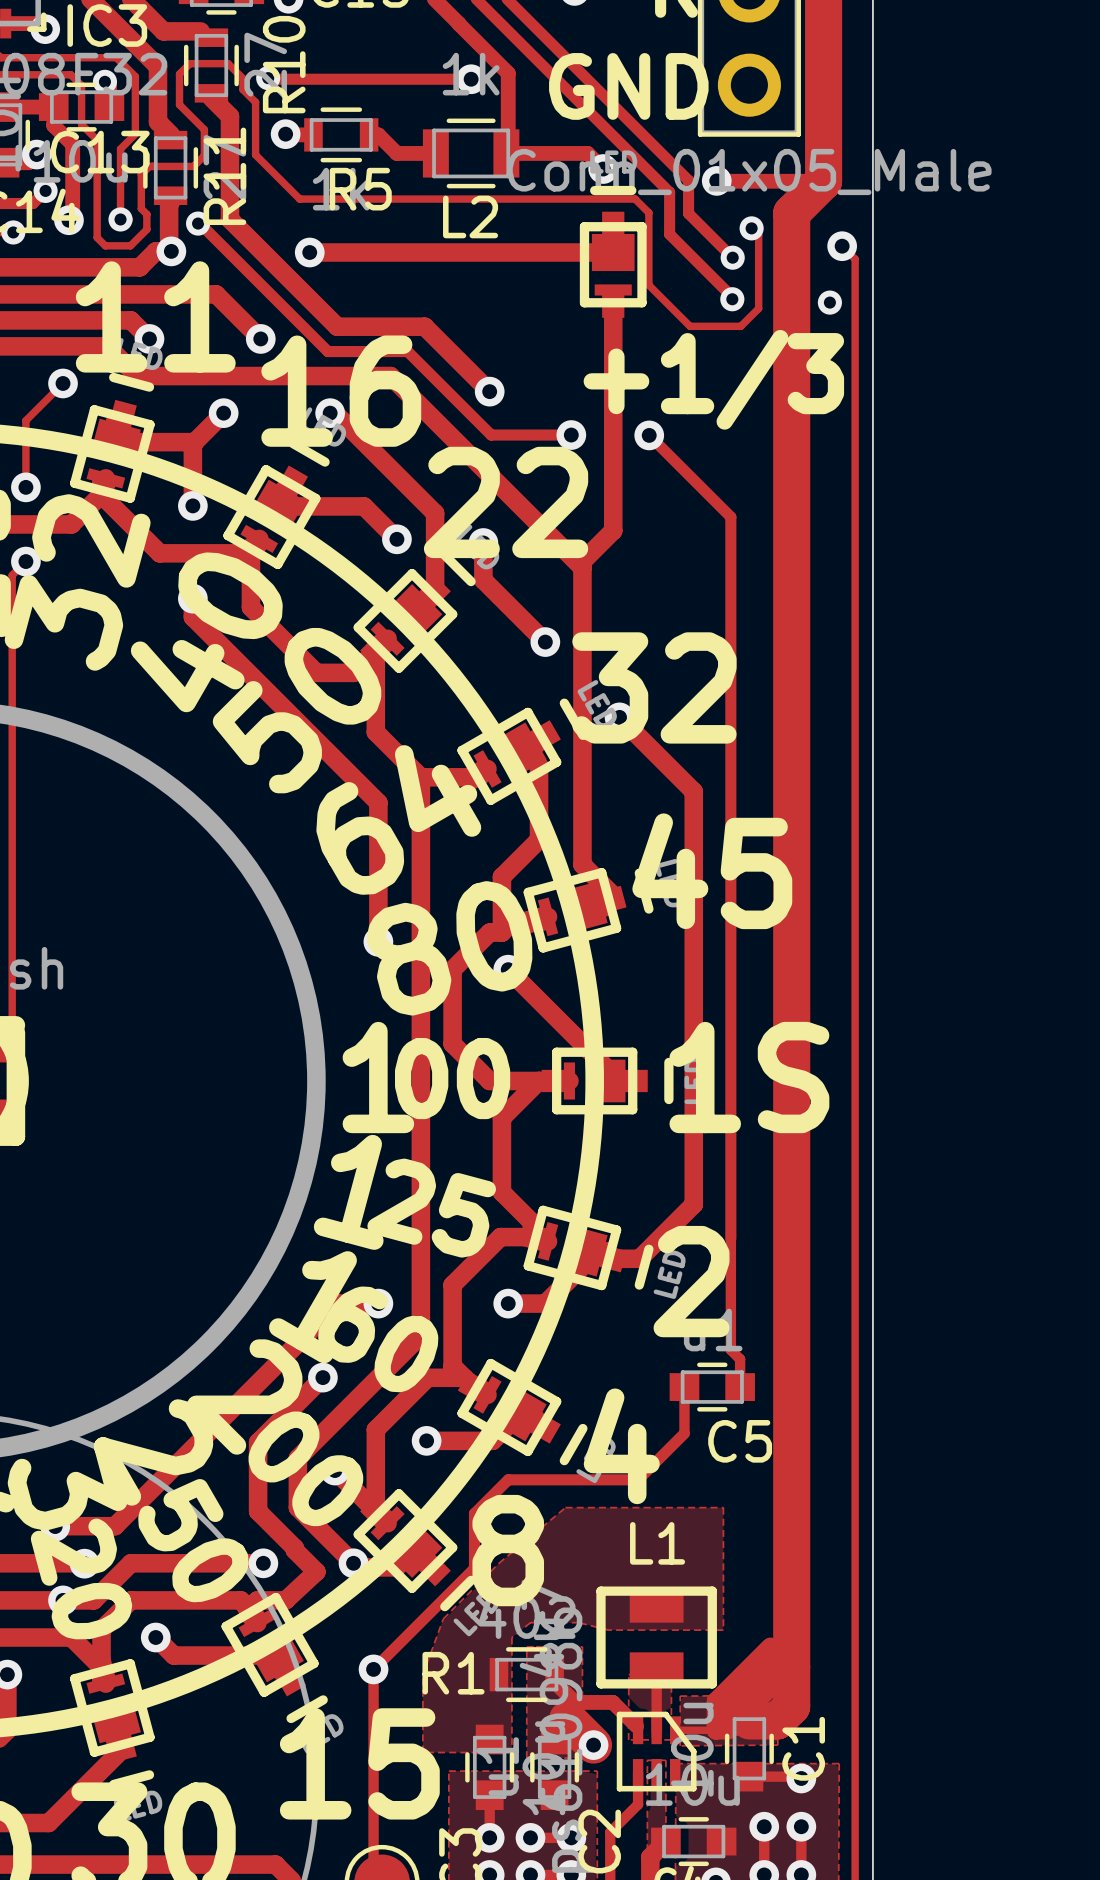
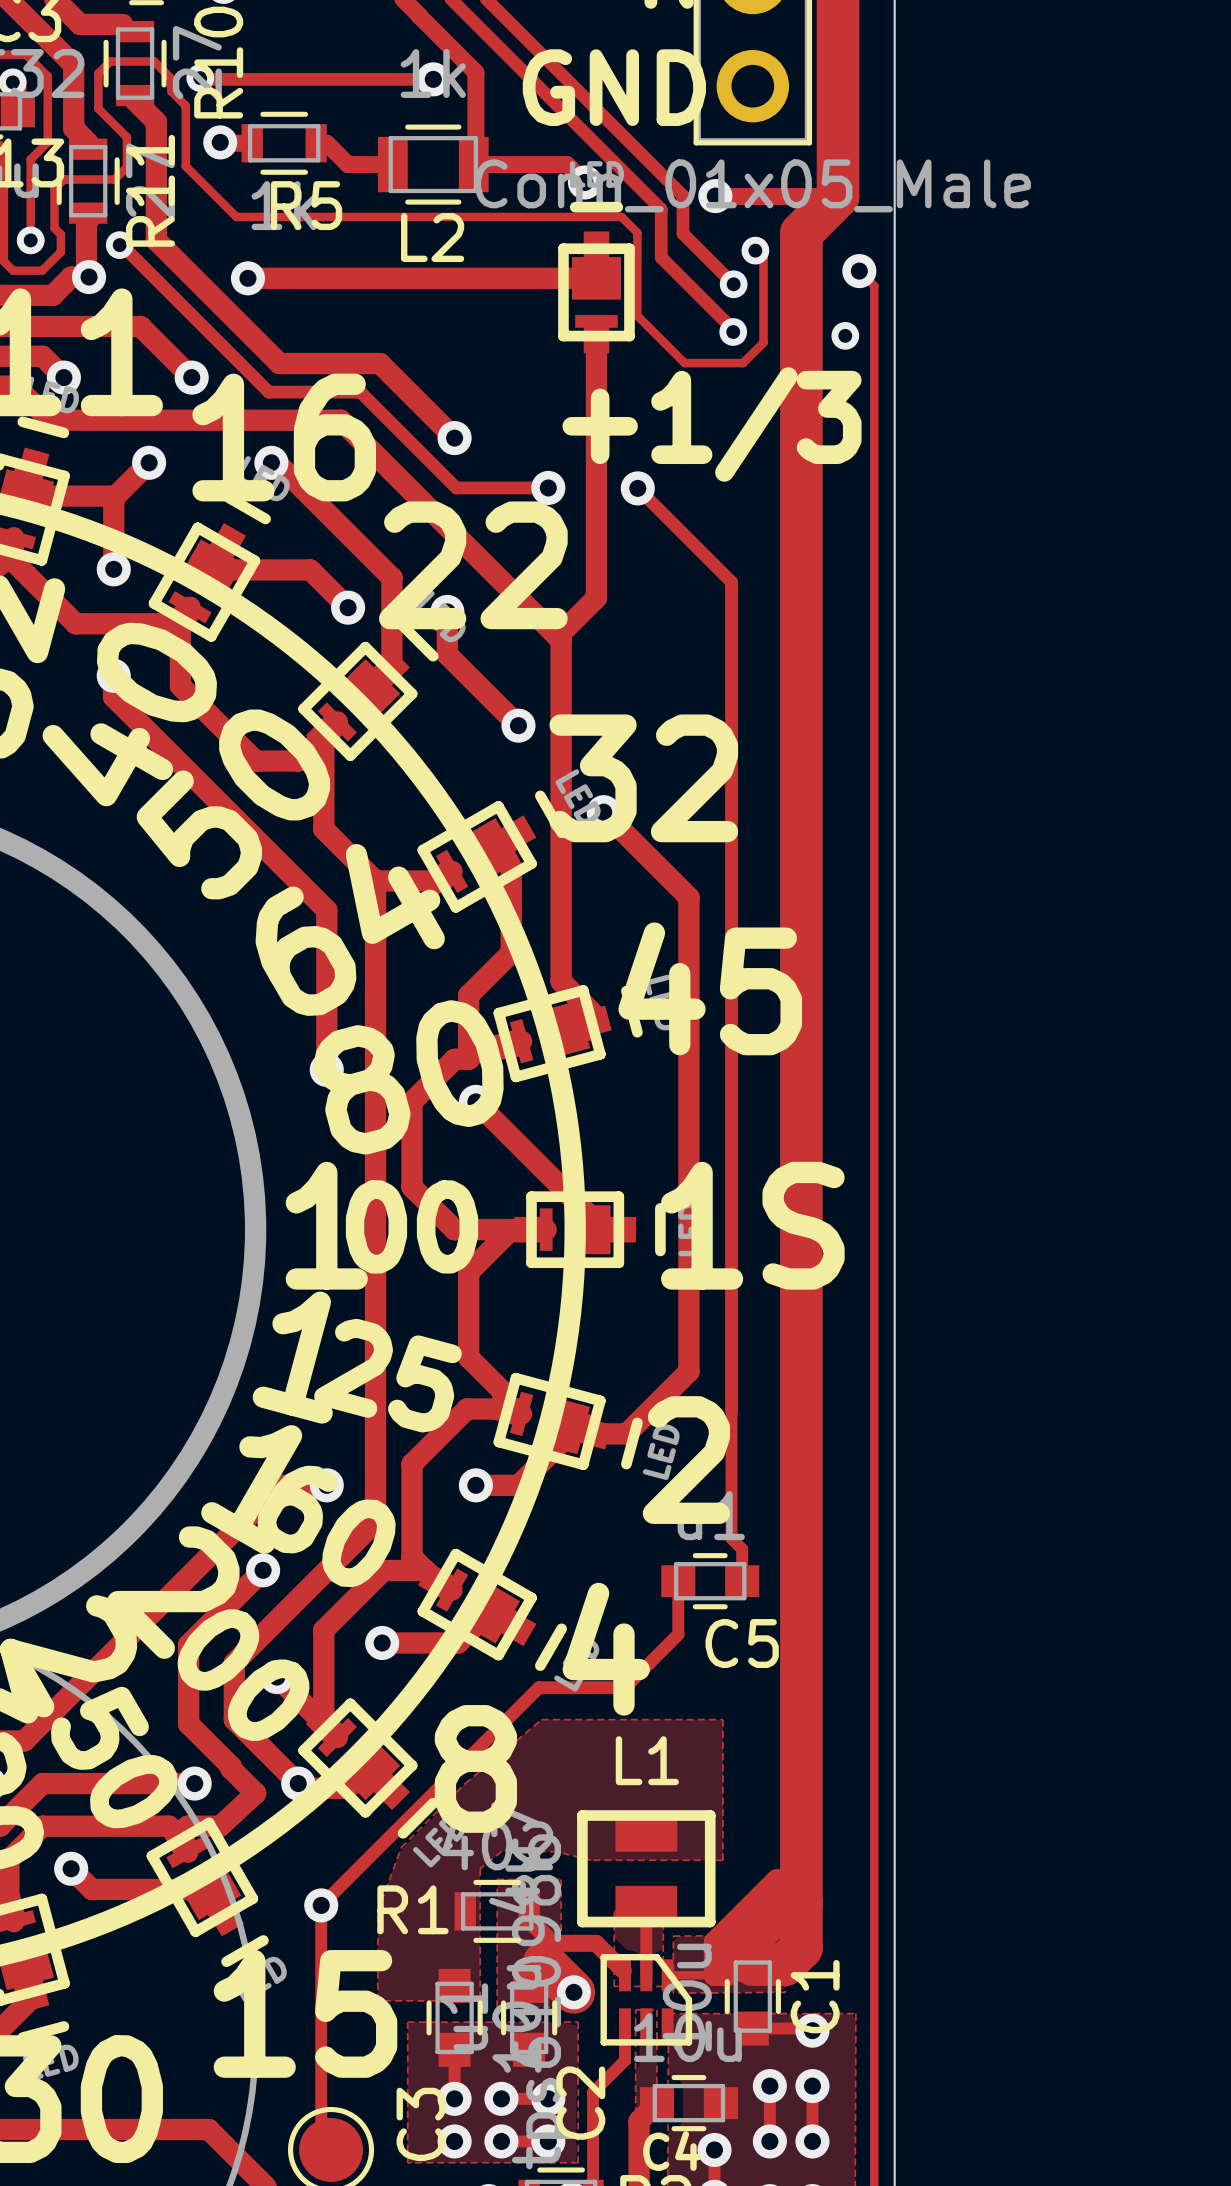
track: (563, 1479) (508, 1479) (474, 1513) (474, 1568) -> (538, 1687) (437, 1789)

